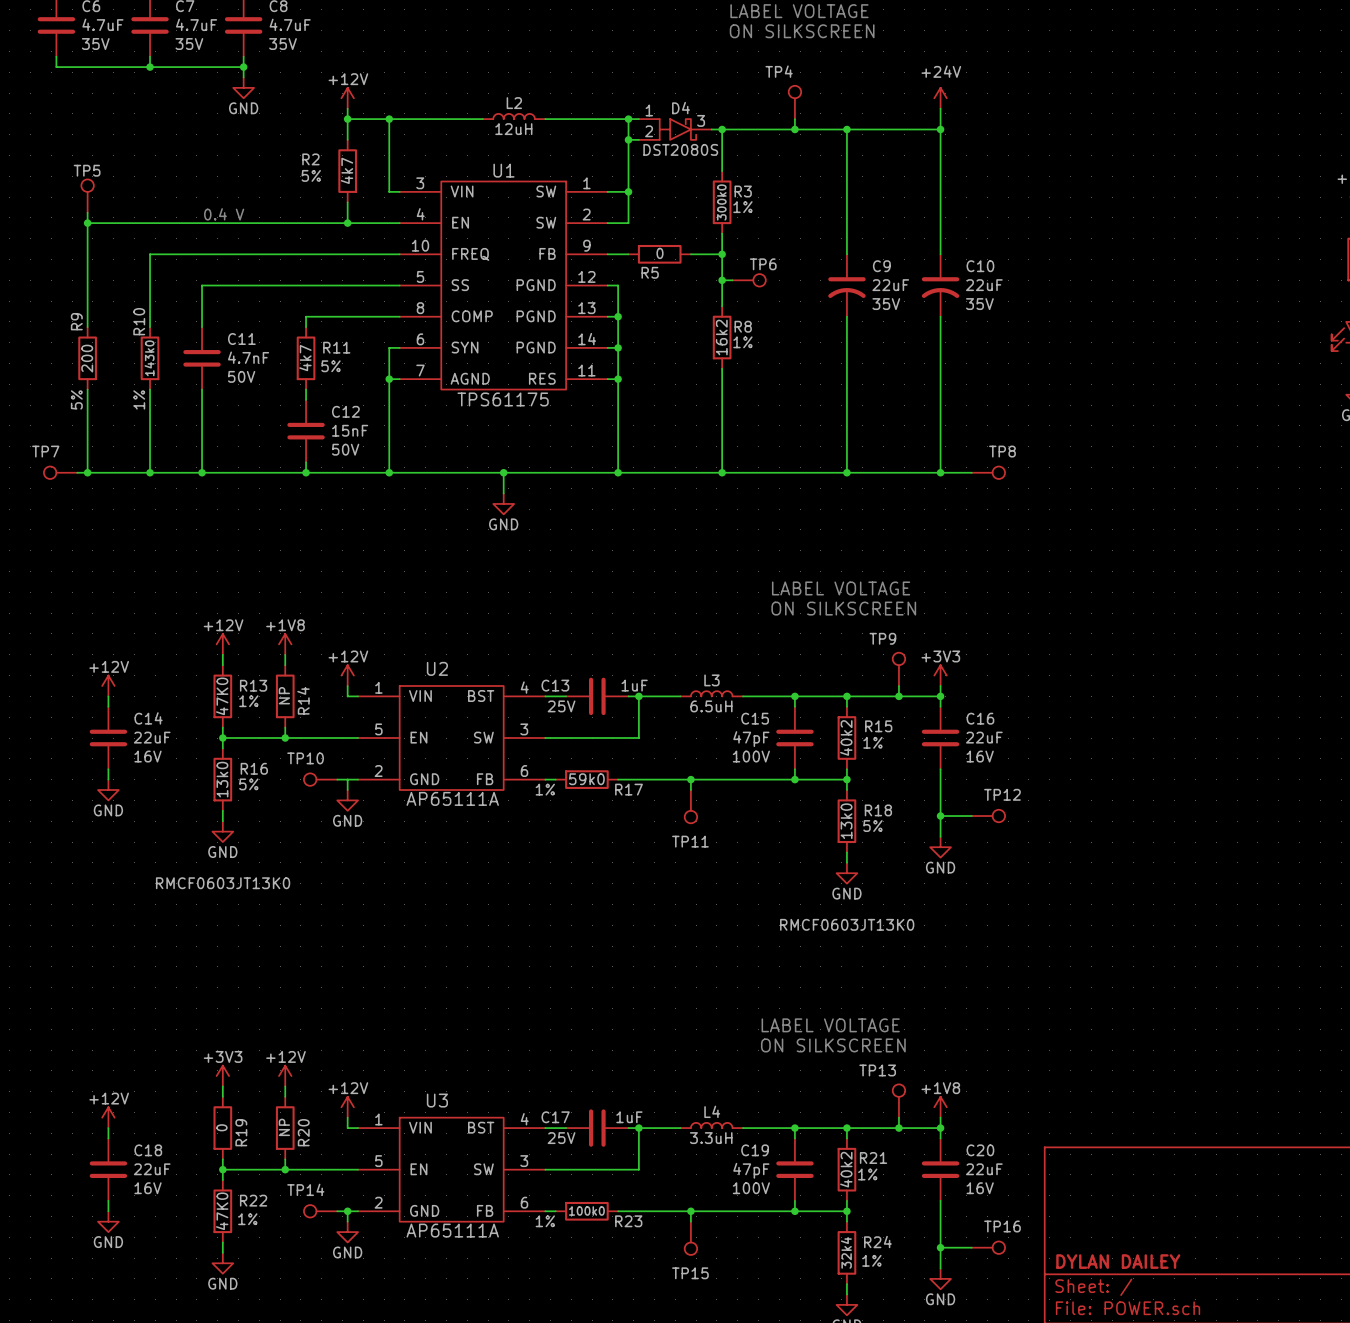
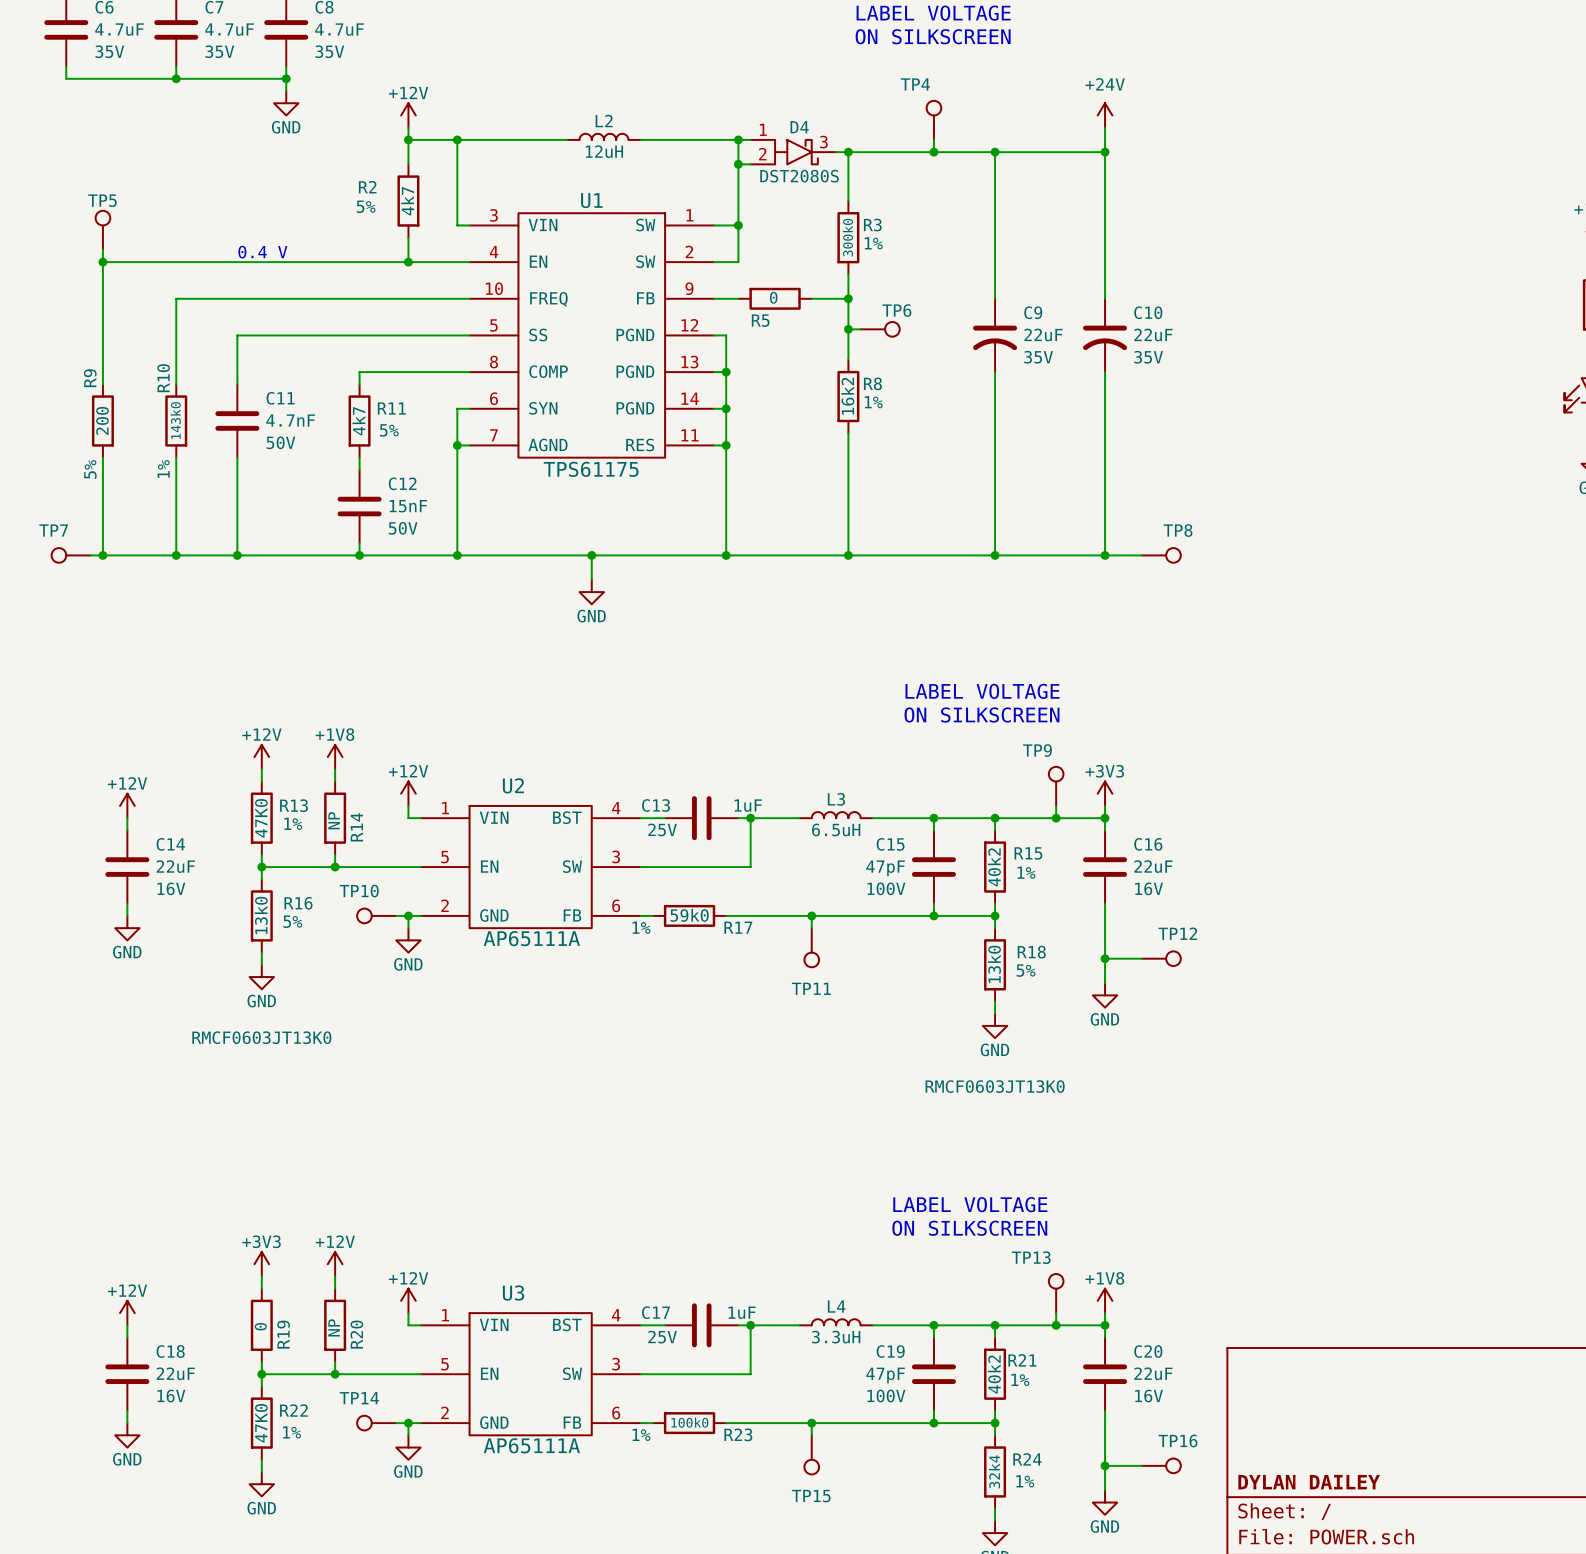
junction: none -> (408, 915)

